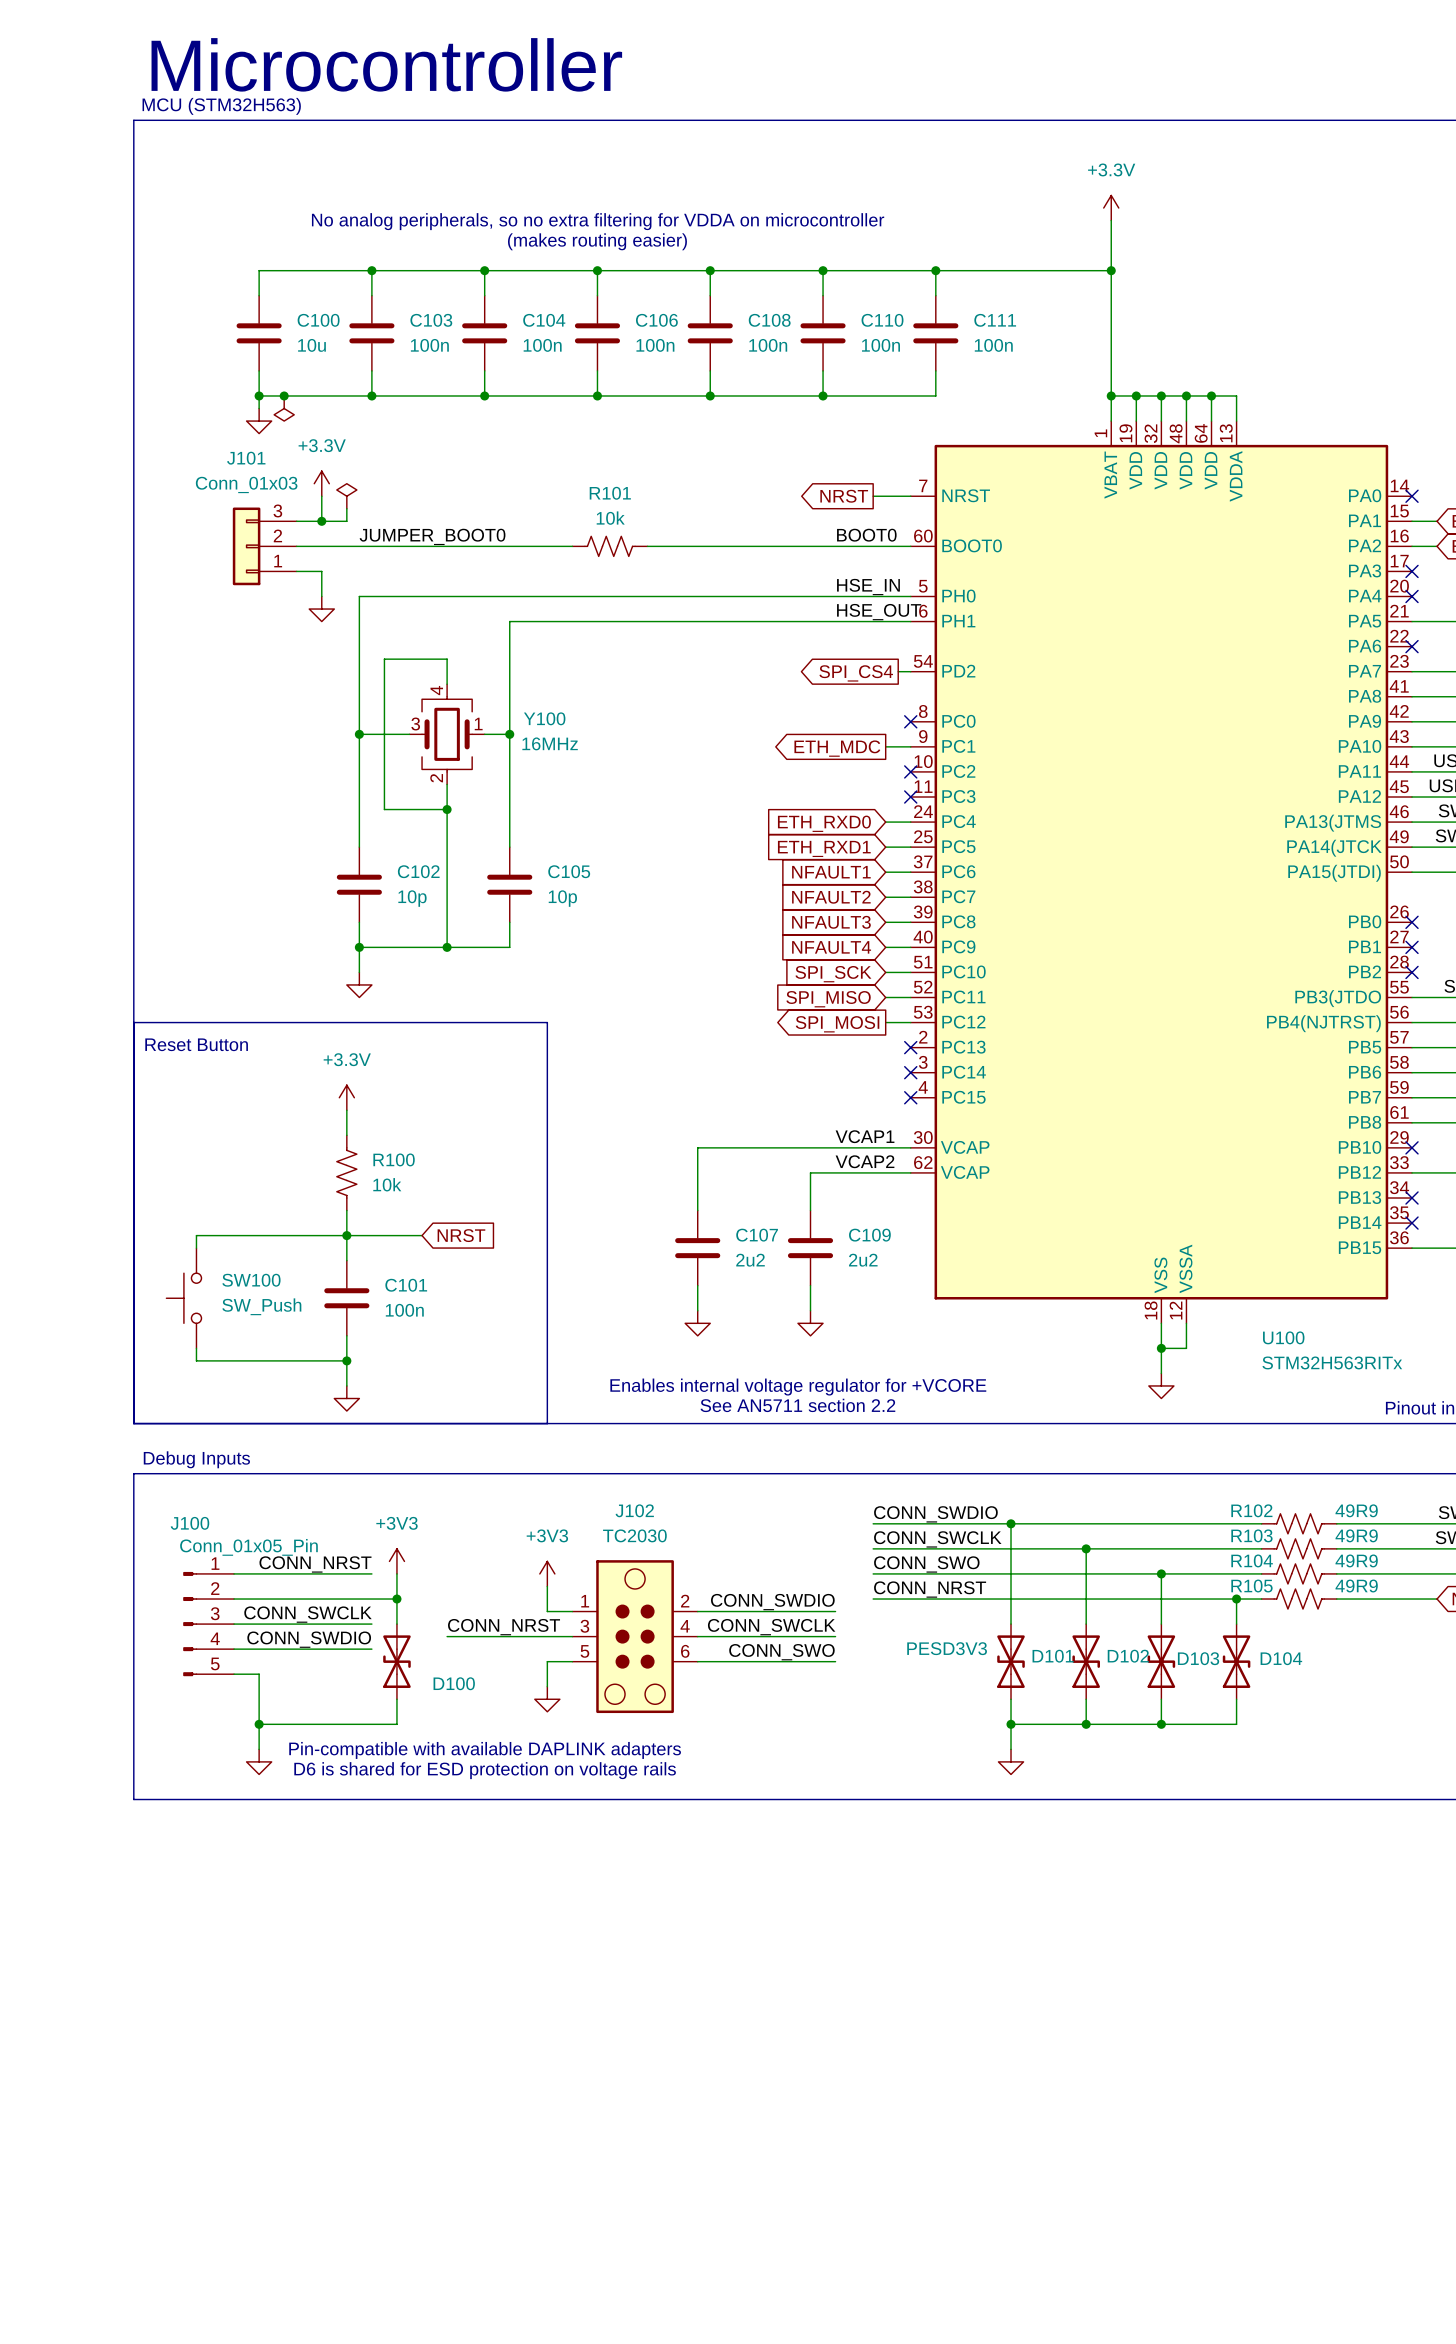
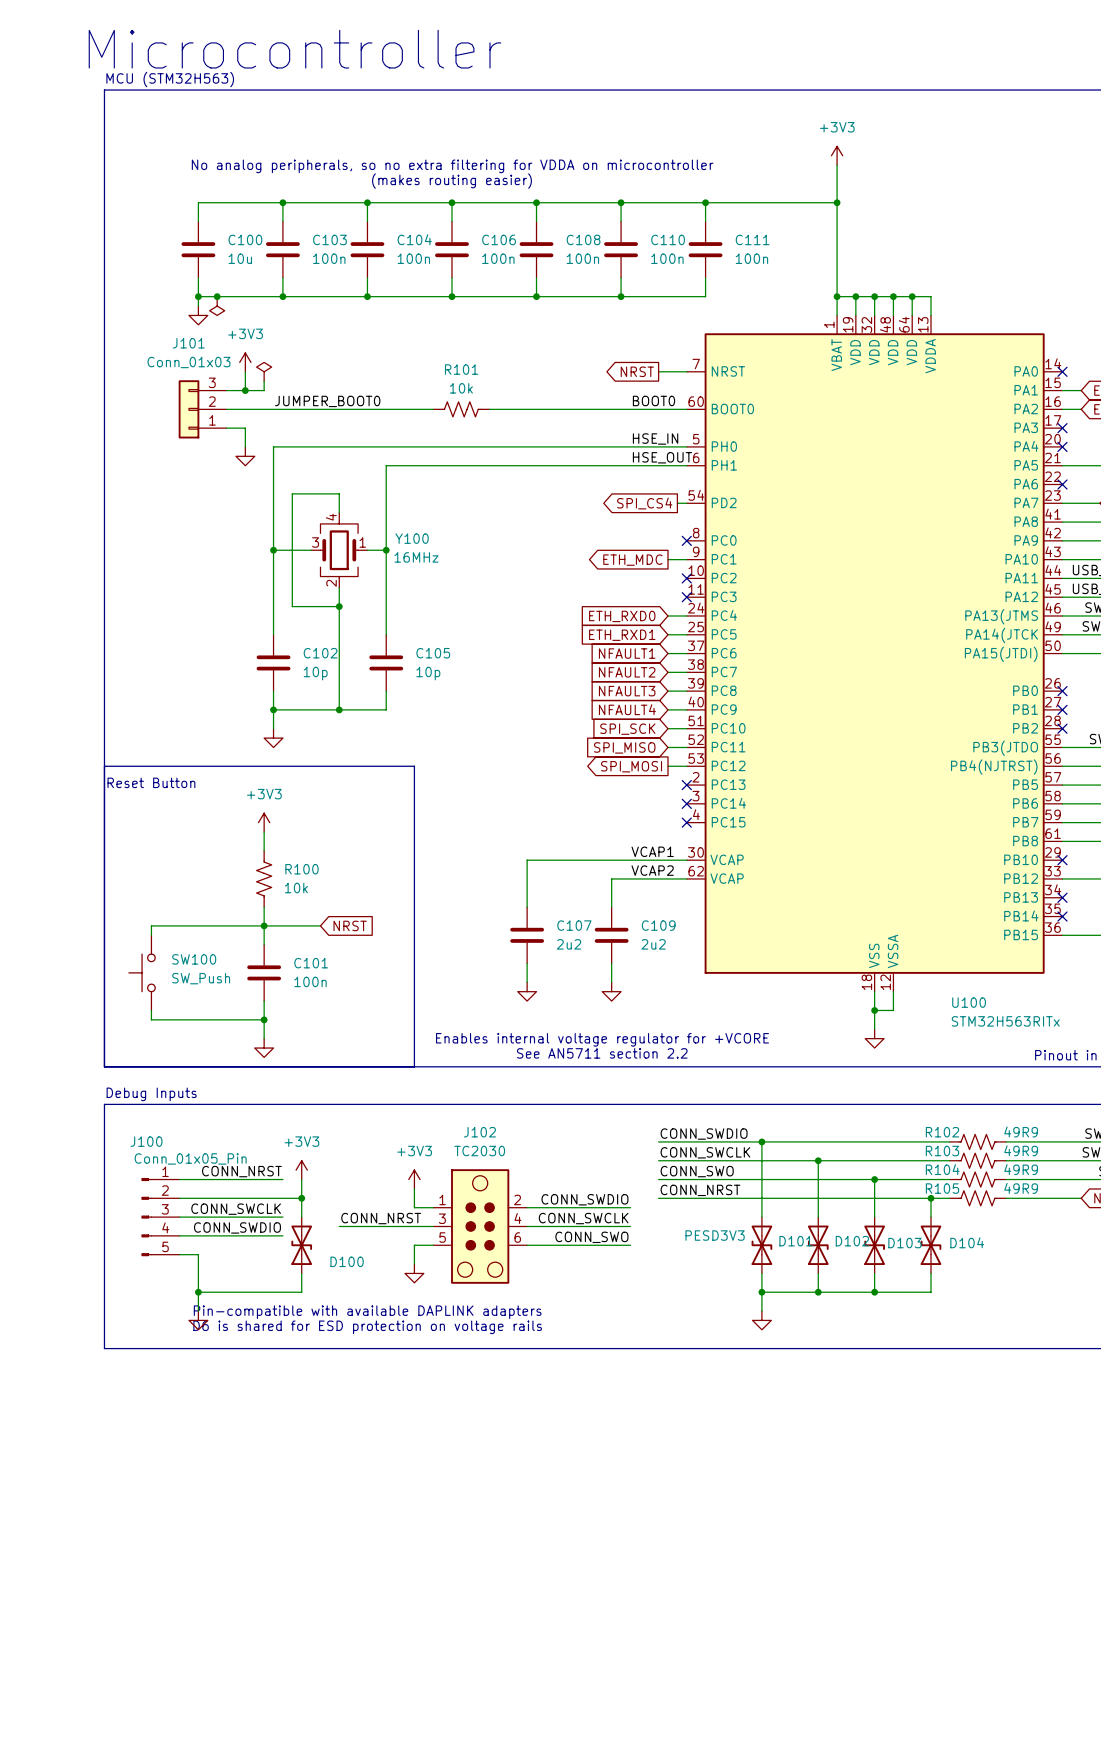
power symbol: +3.3V (1111, 208) -> +3V3 (837, 155)
power symbol: +3.3V (321, 483) -> +3V3 (245, 362)
power symbol: +3.3V (346, 1097) -> +3V3 (264, 822)

